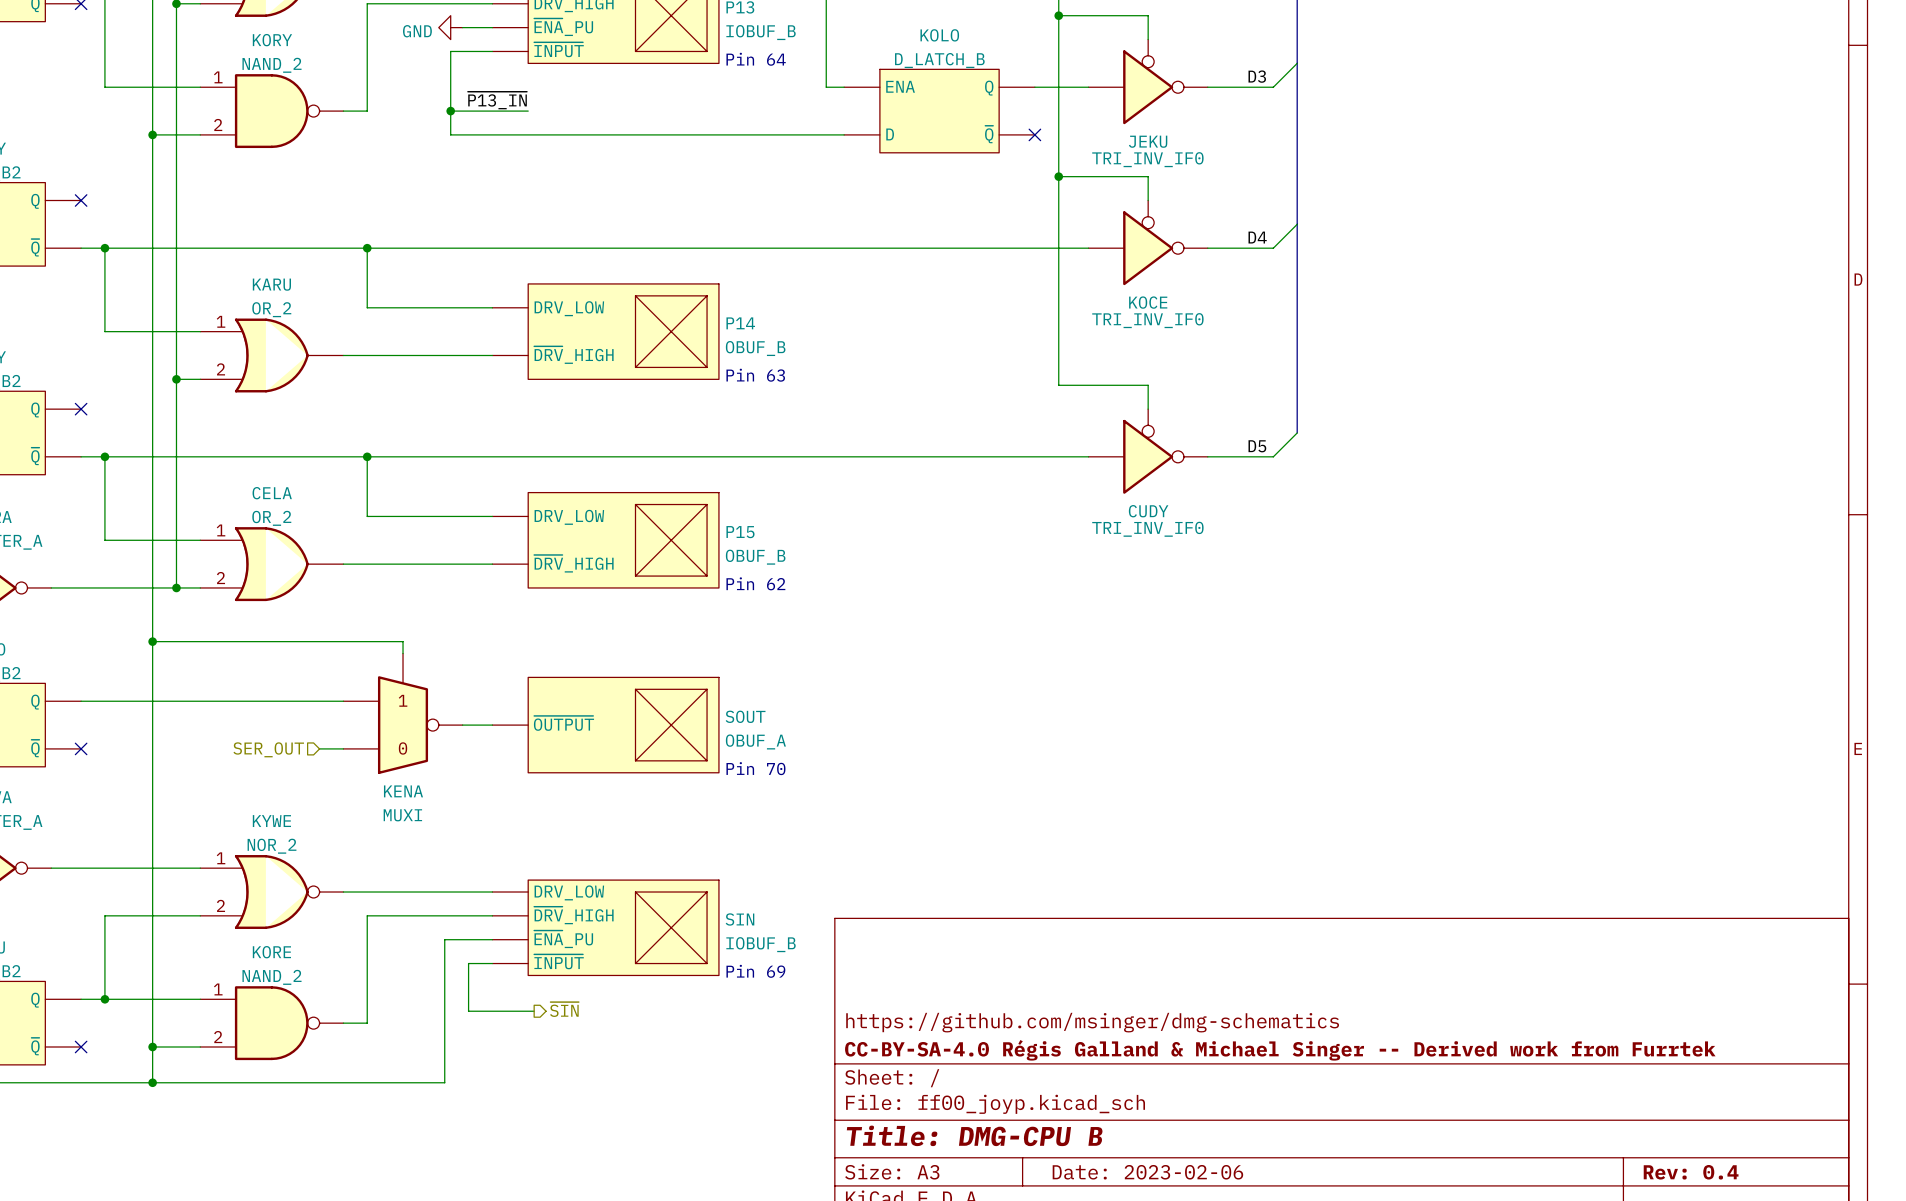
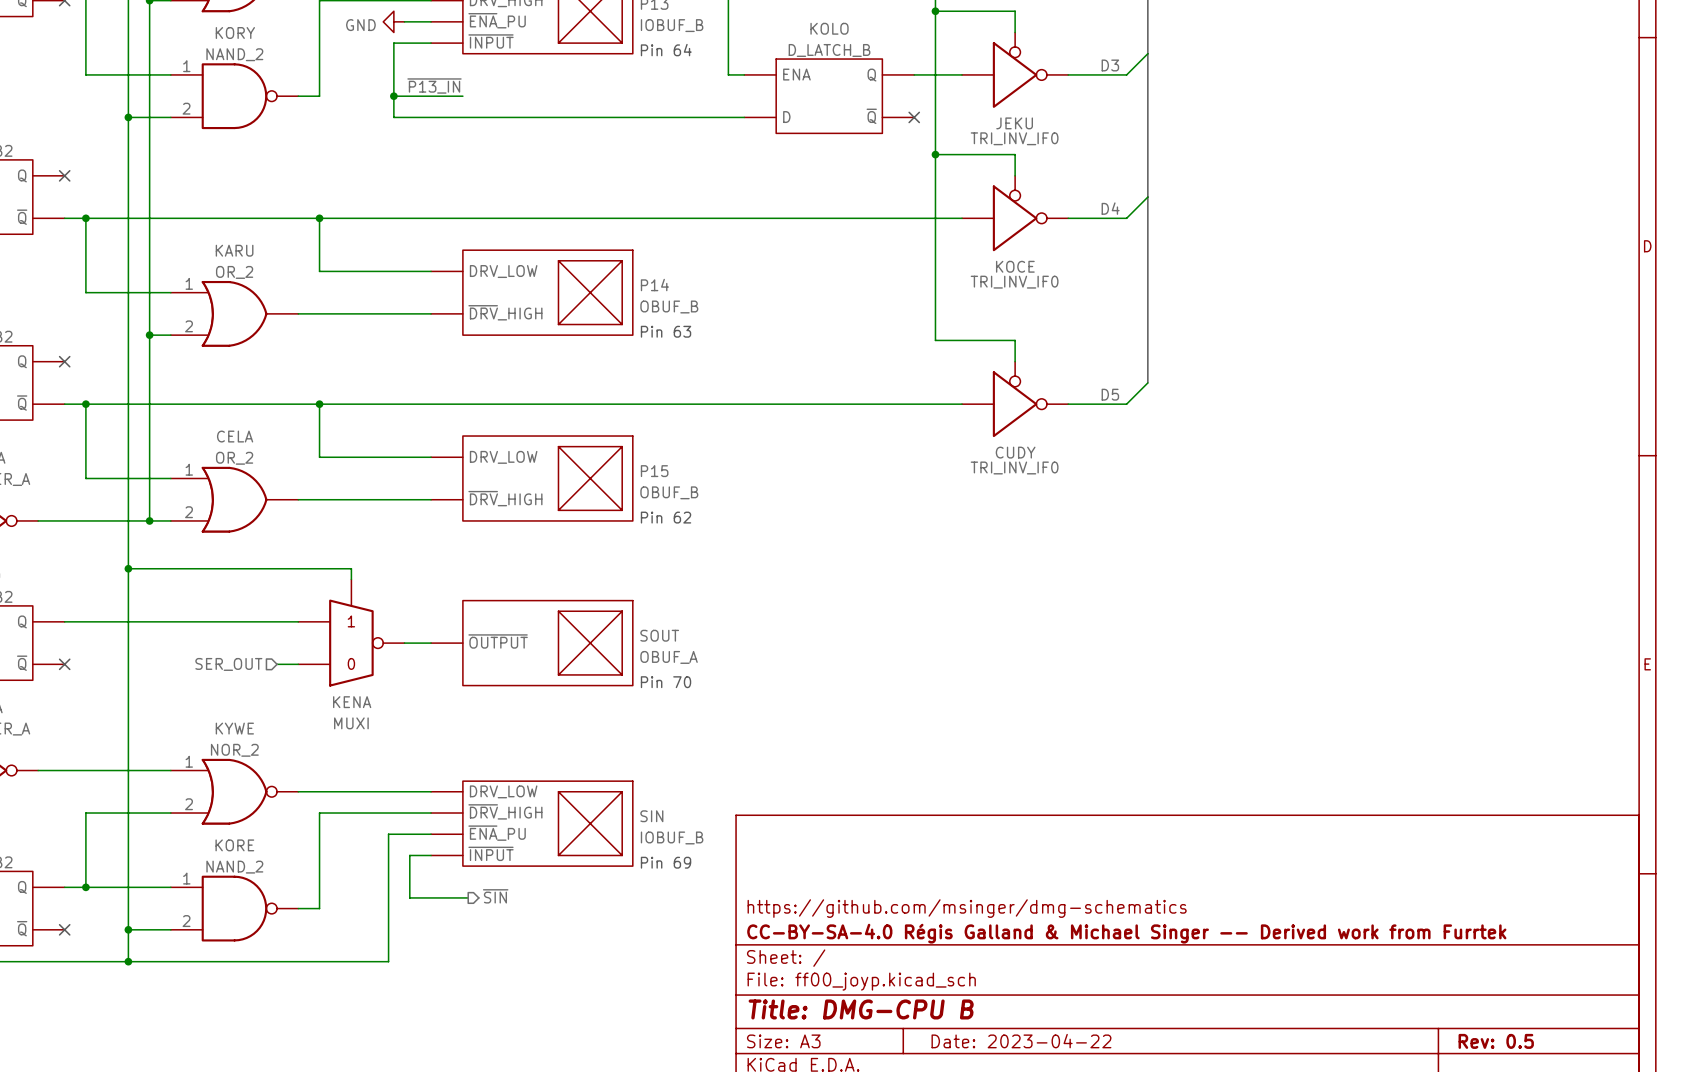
title block: Date: 2023-02-06 (1147, 1172) -> Date: 2023-04-22 (1021, 1041)
title block: Rev: 0.4 (1691, 1172) -> Rev: 0.5 (1496, 1041)

